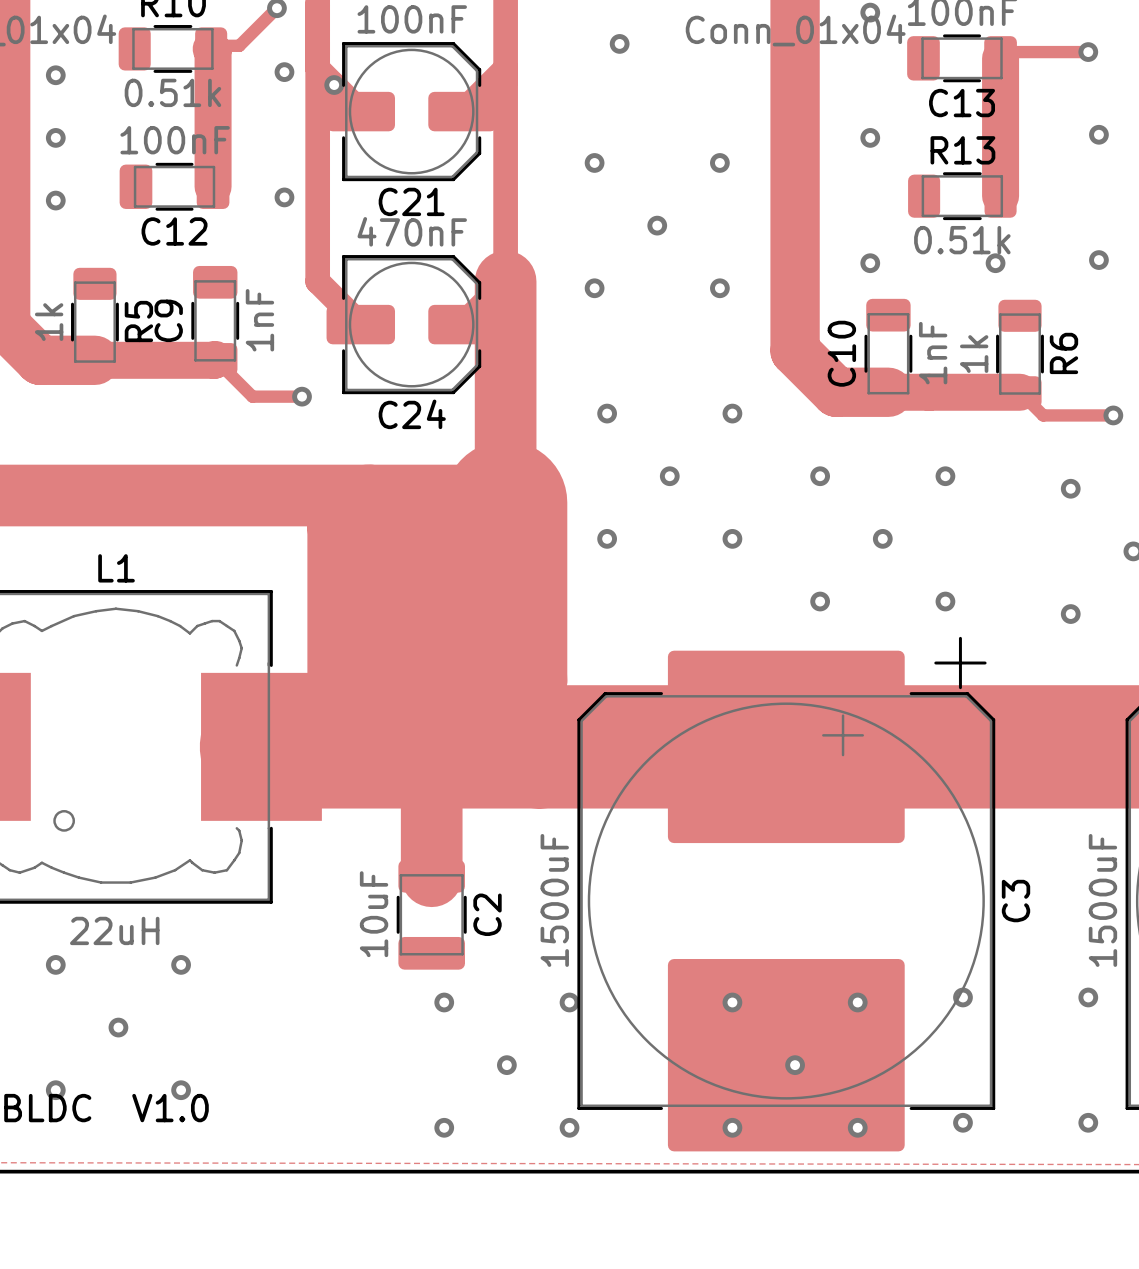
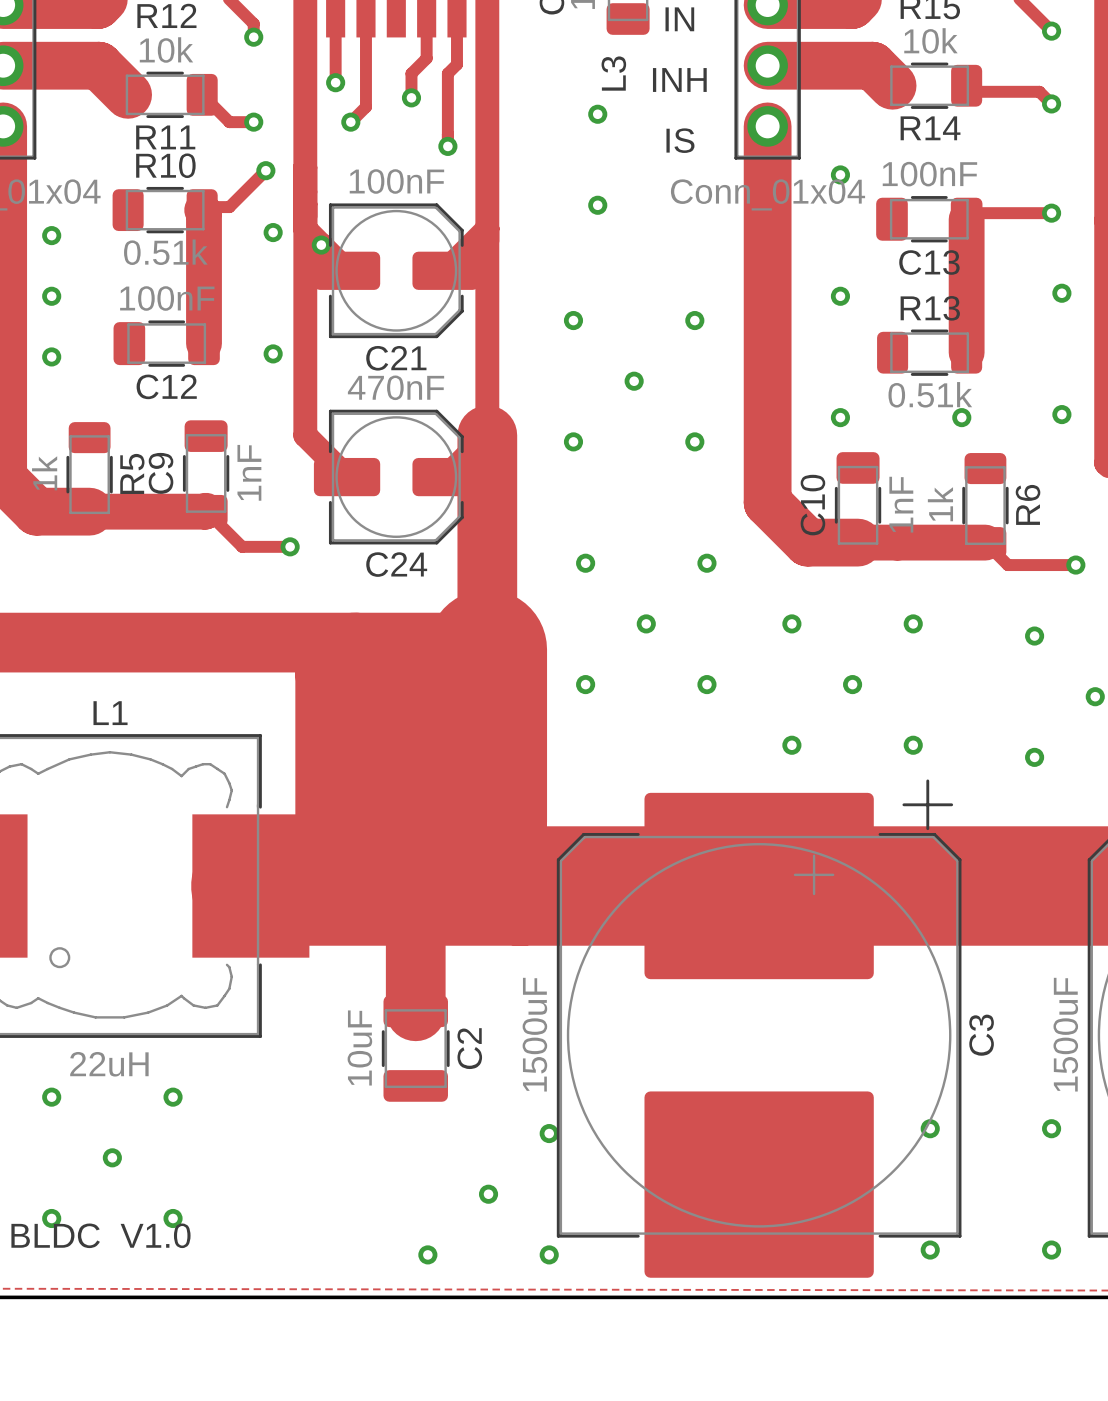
via: (444, 1002) -> none
via: (732, 1002) -> none
via: (857, 1002) -> none
via: (795, 1065) -> none
via: (732, 1127) -> none
via: (857, 1127) -> none

